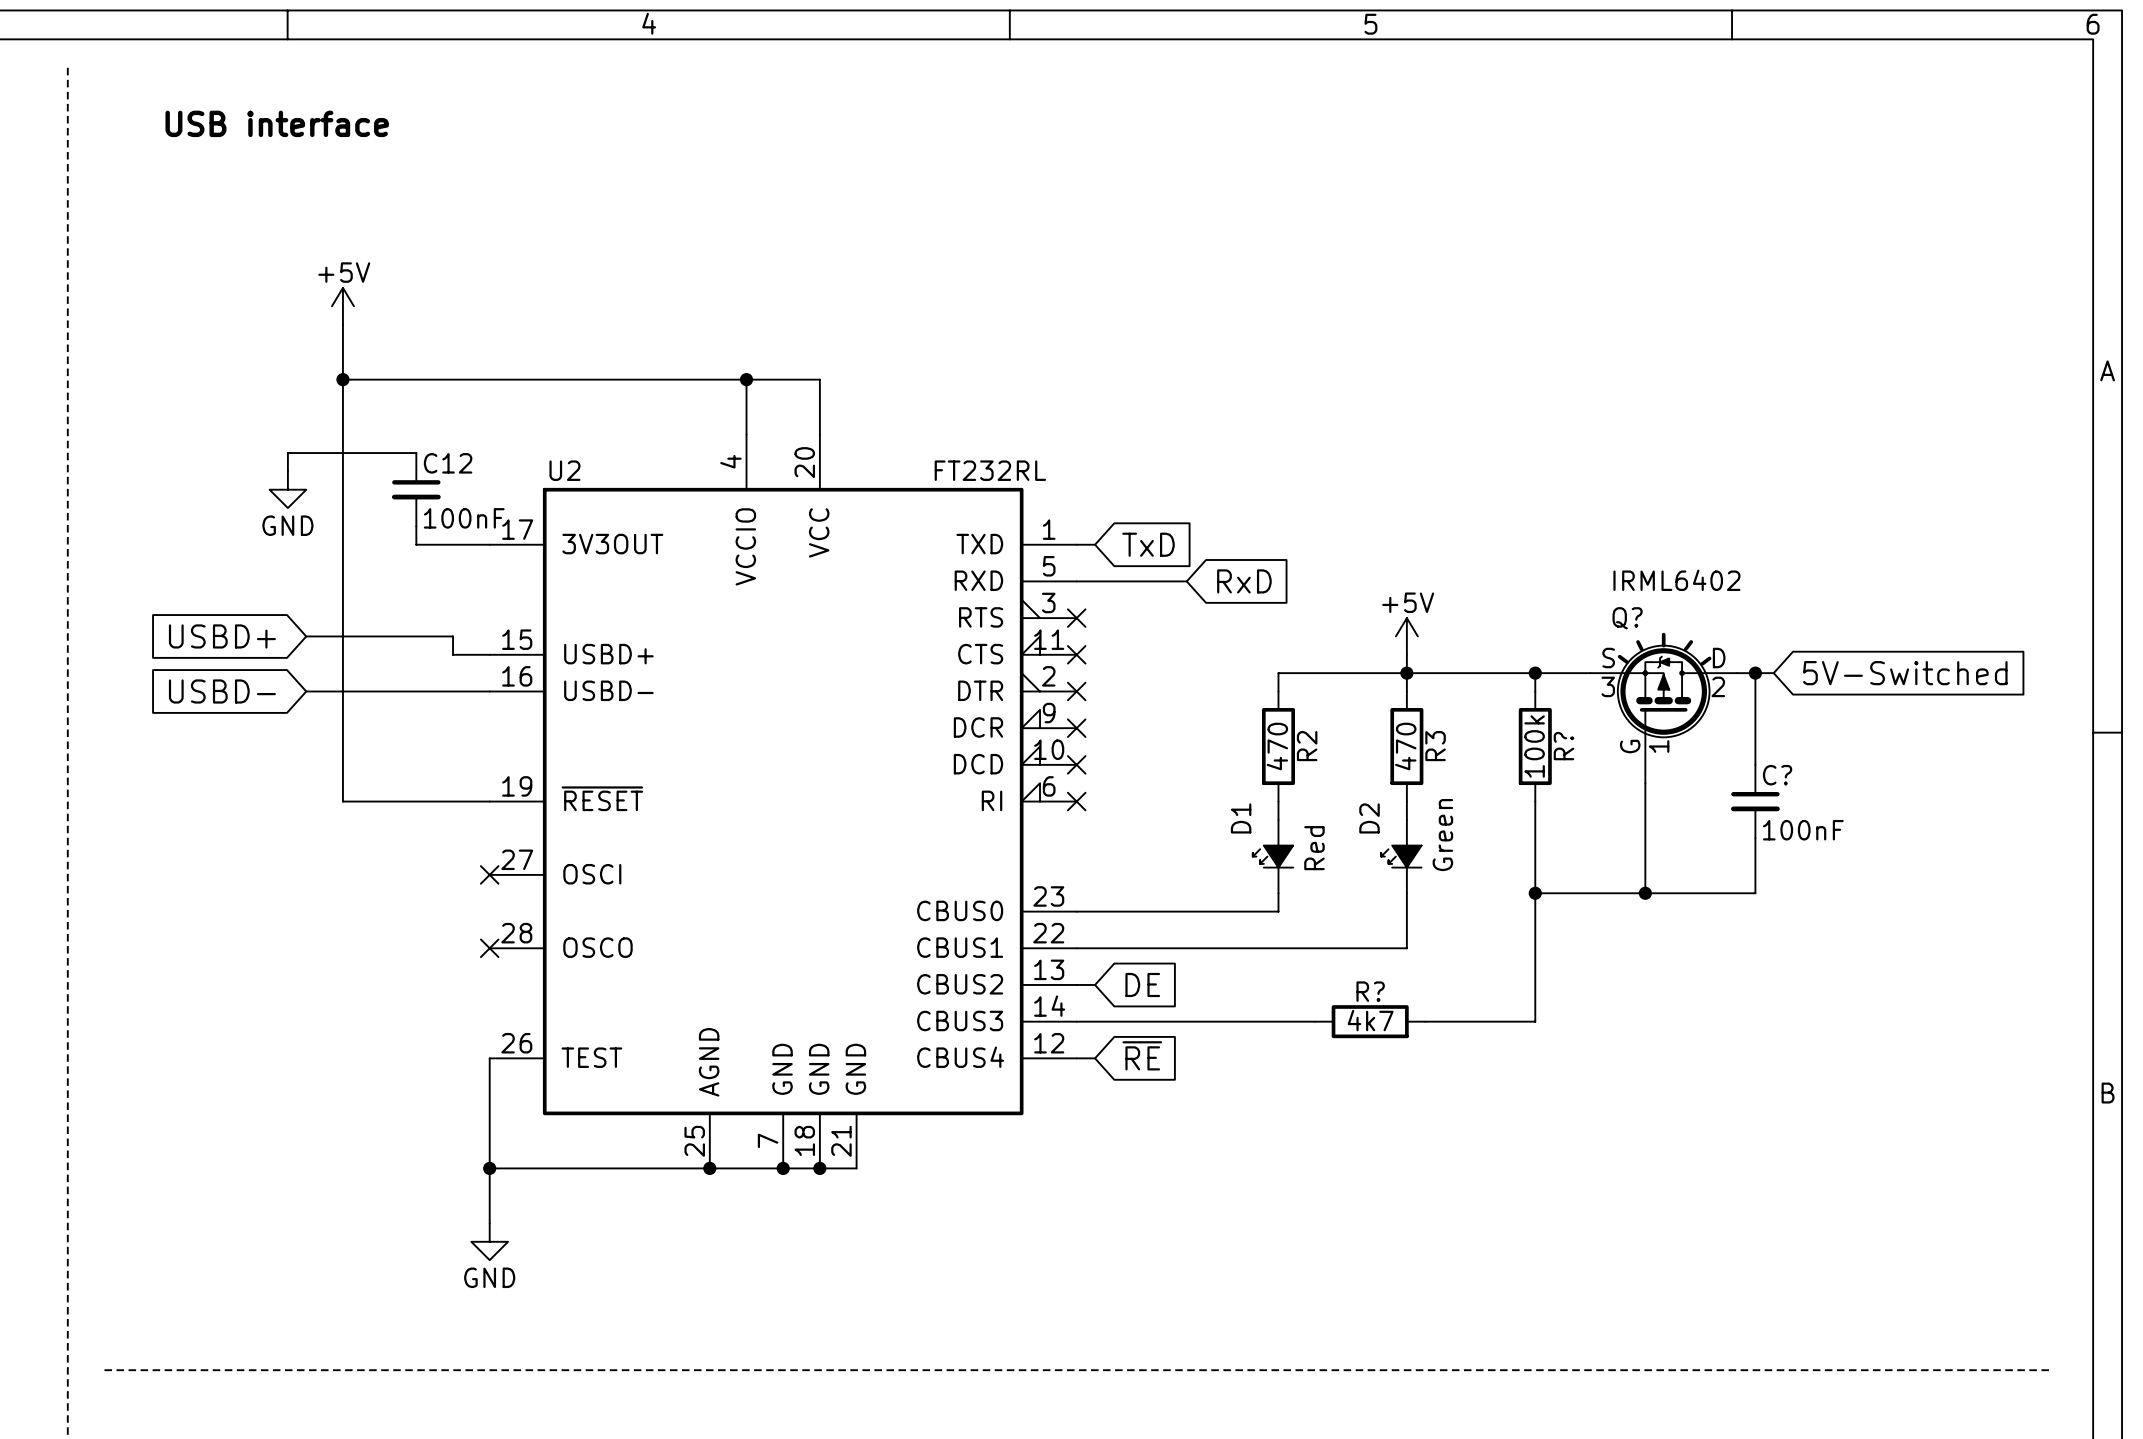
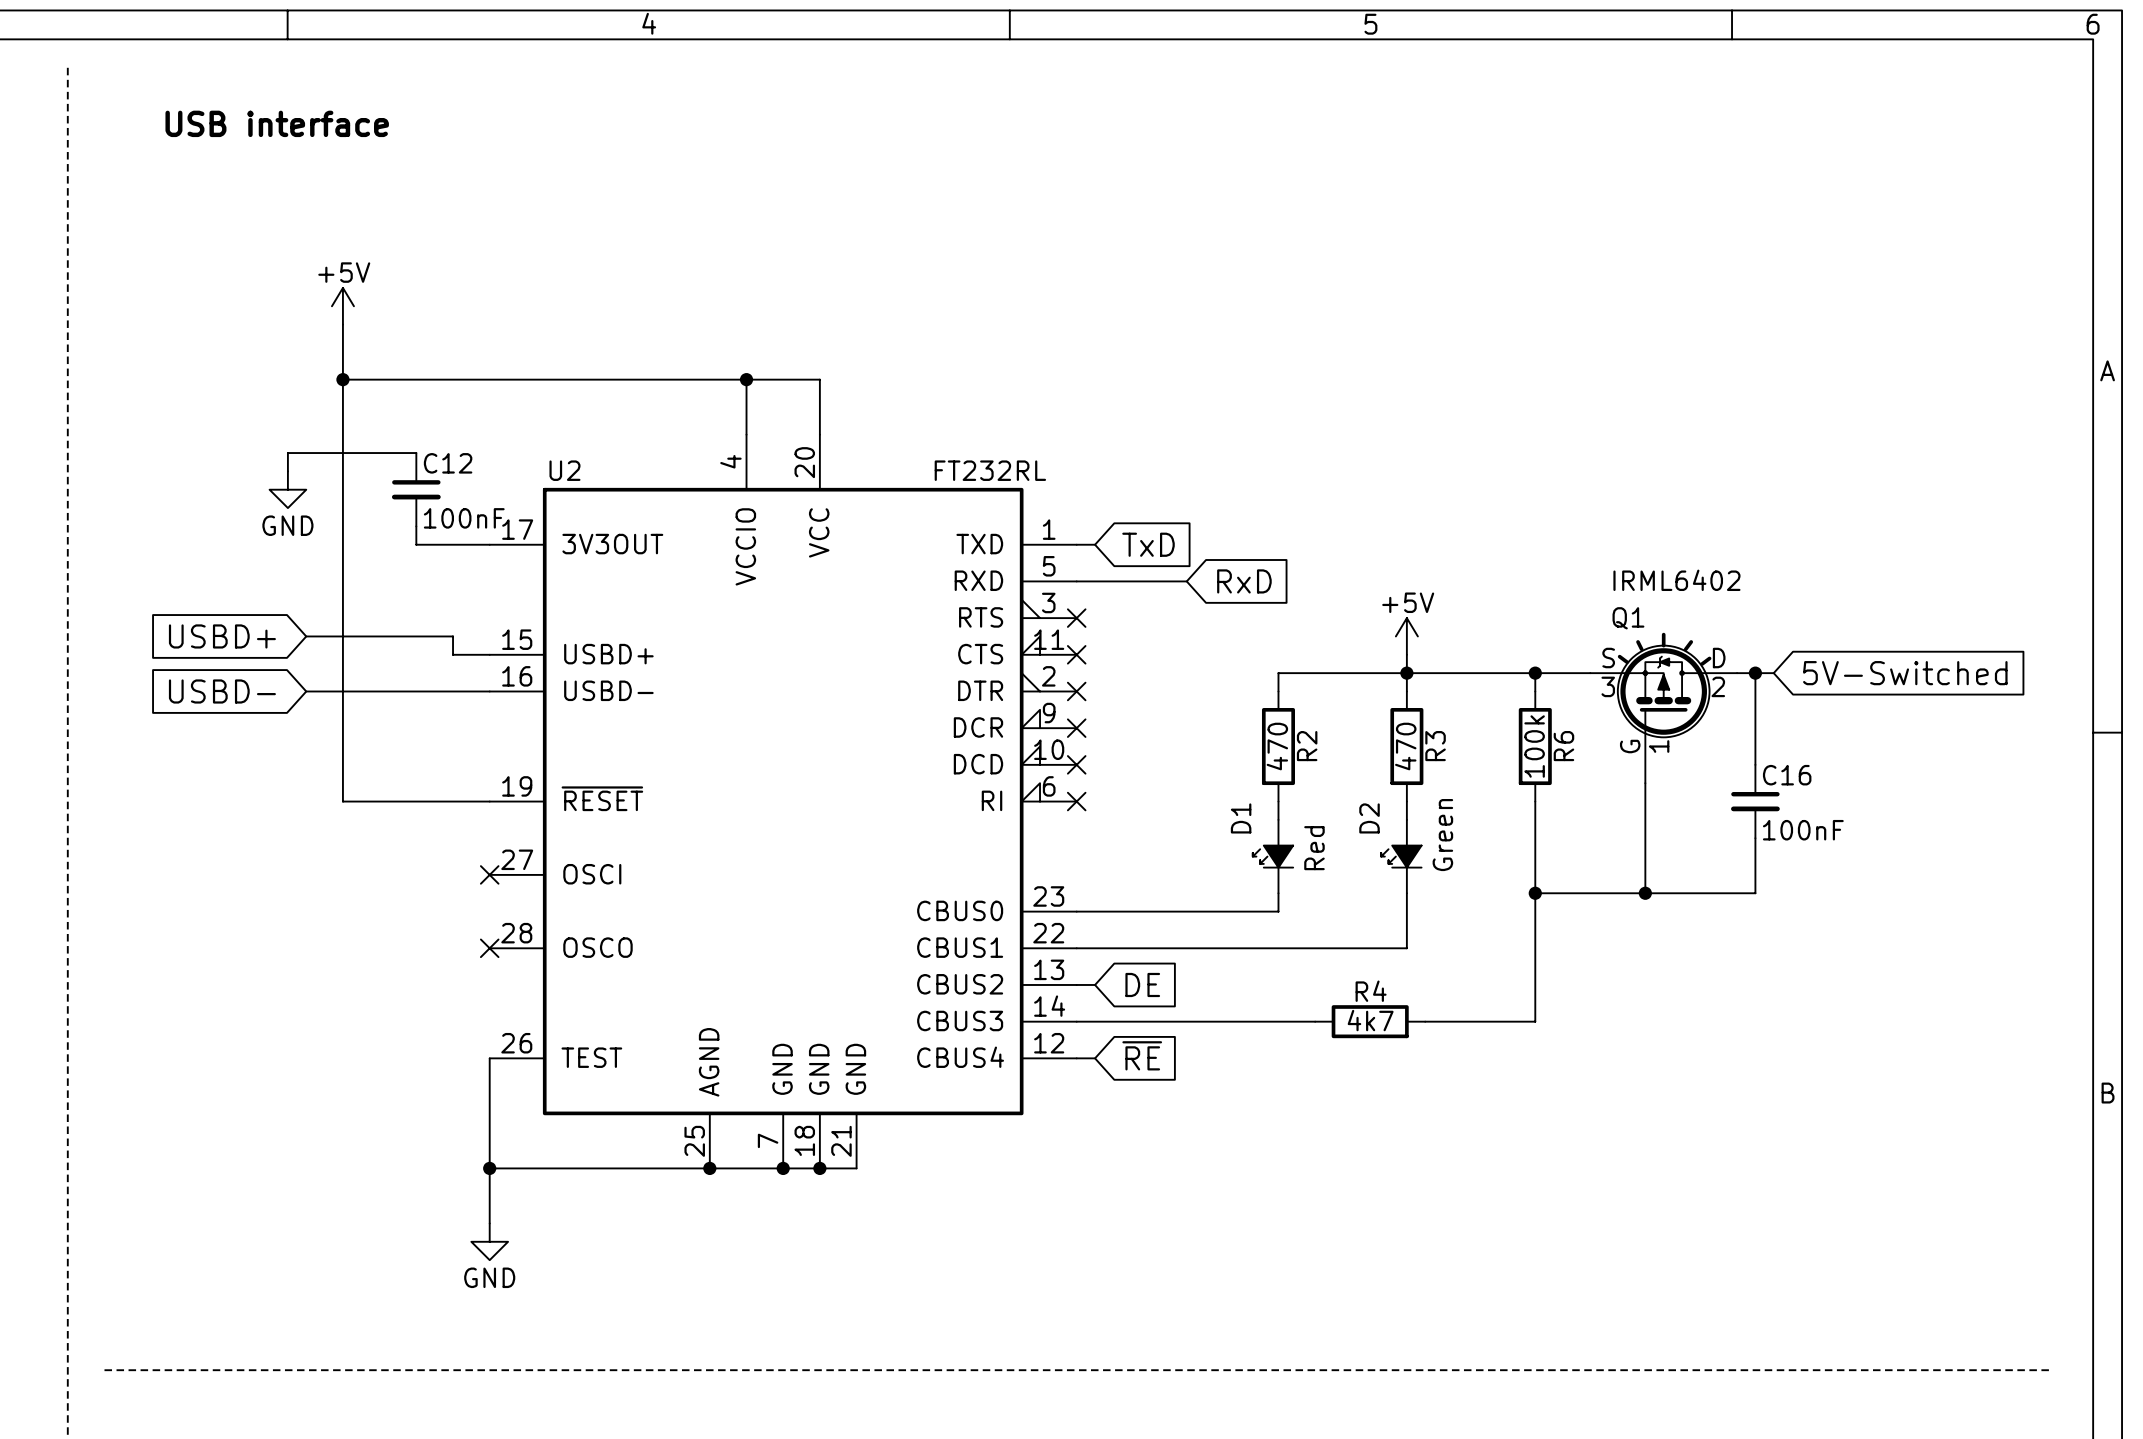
Q? name: Q? (1627, 618) -> Q1 (1628, 618)
R? name: R? (1563, 746) -> R6 (1563, 746)
C? name: C? (1777, 775) -> C16 (1787, 775)
R? name: R? (1370, 991) -> R4 (1371, 991)

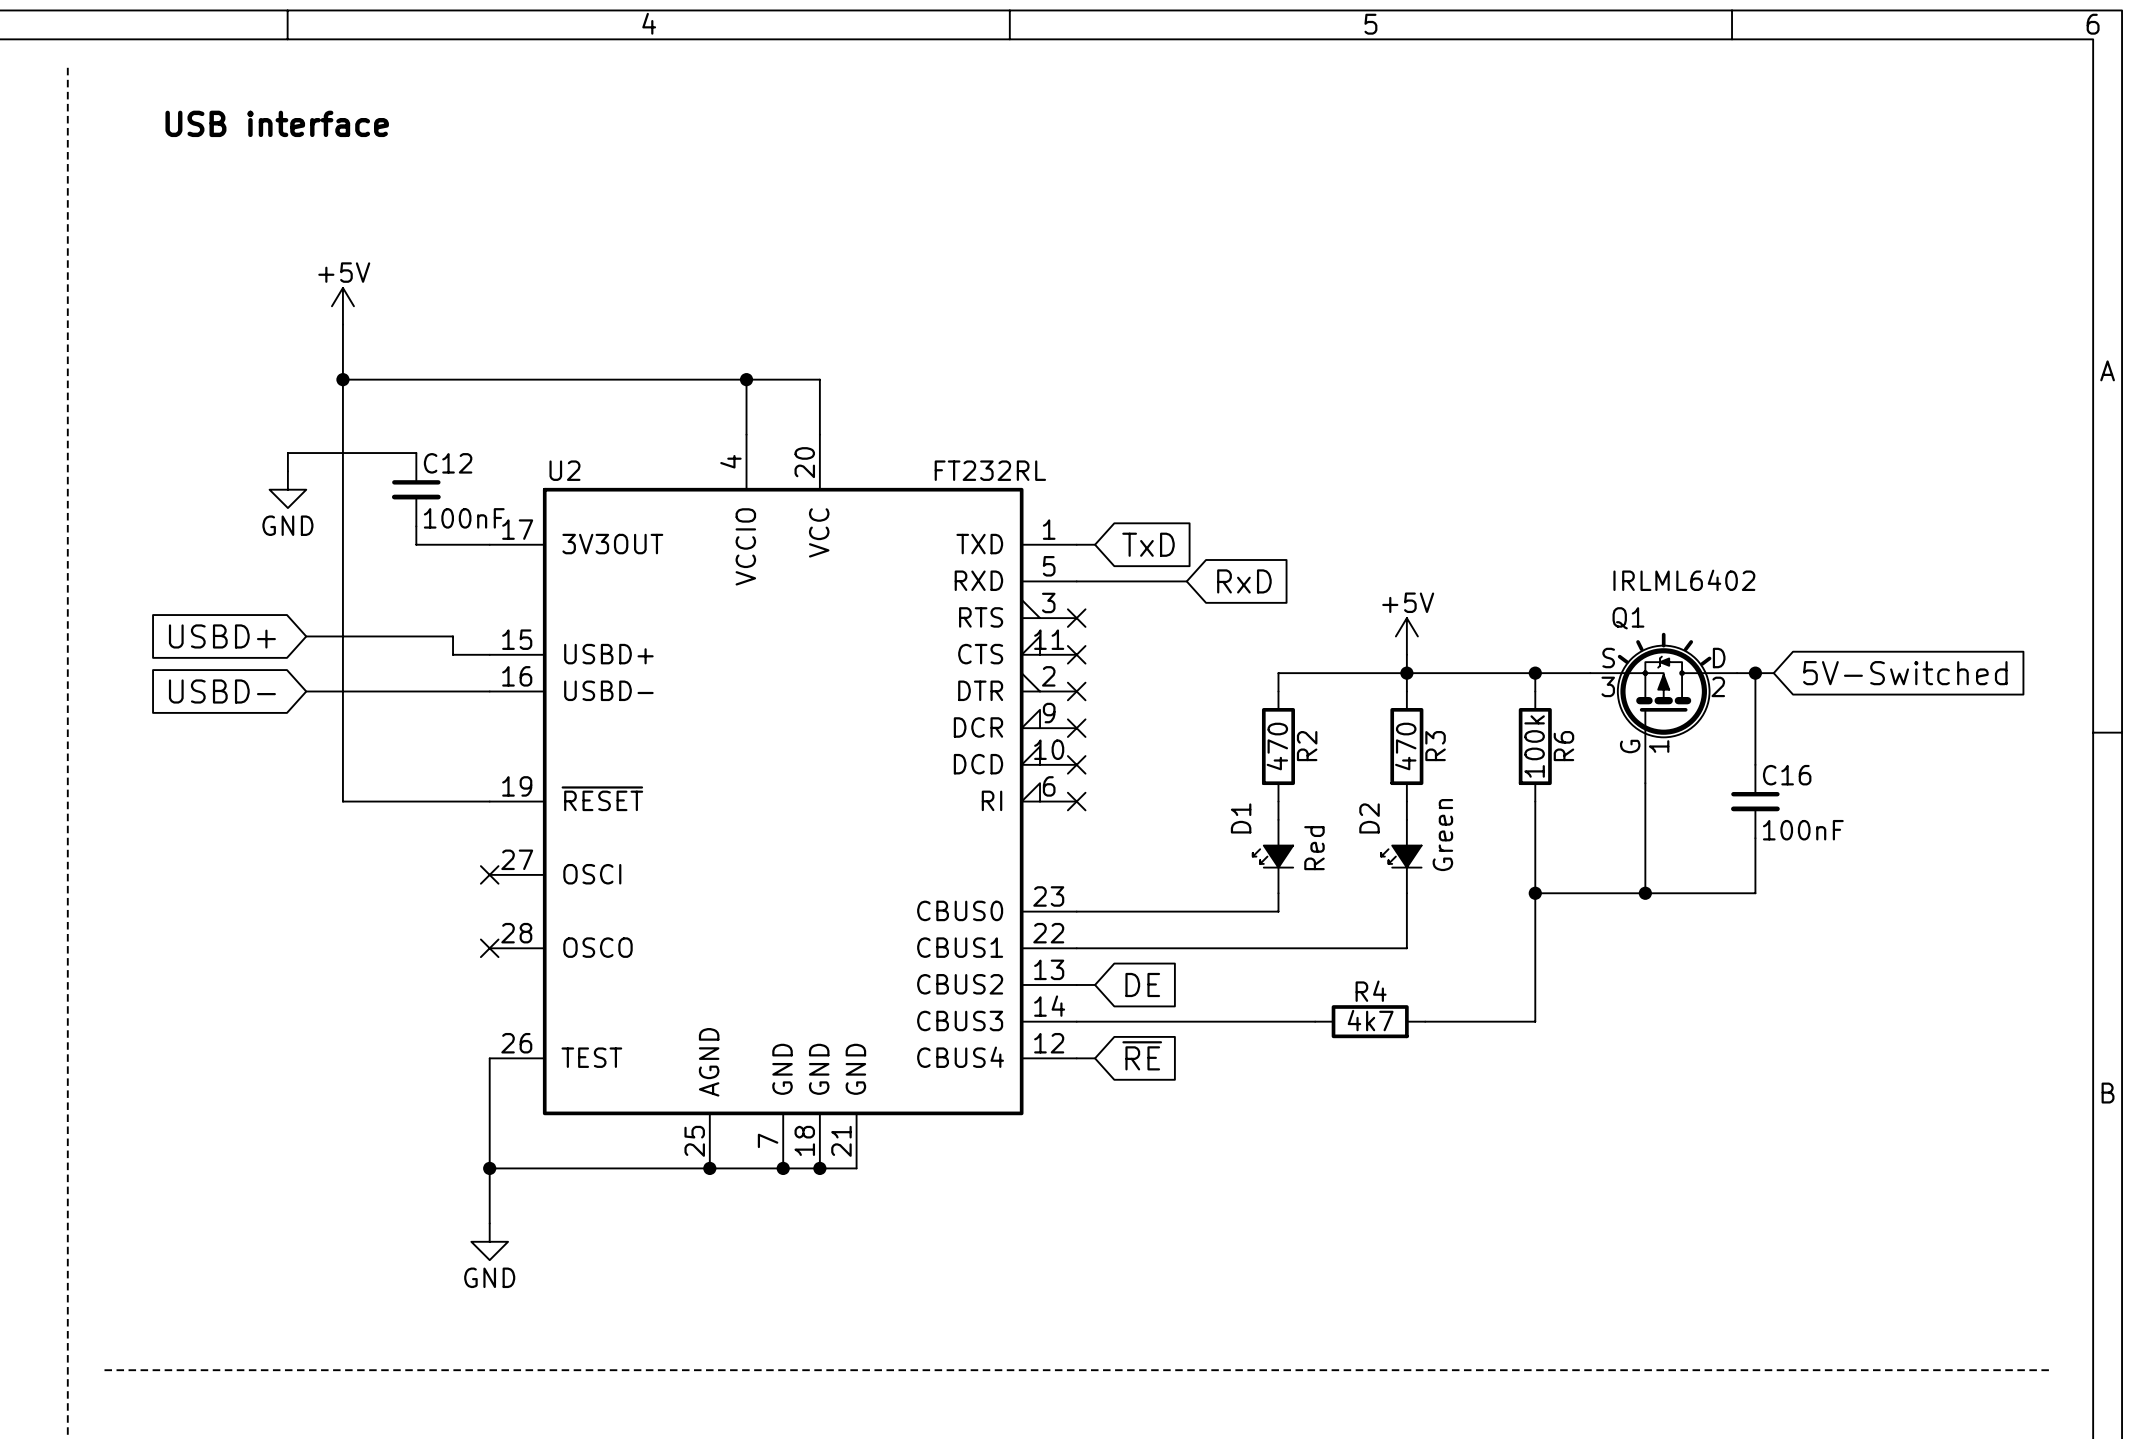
Q1 value: IRML6402 (1676, 580) -> IRLML6402 (1684, 580)

